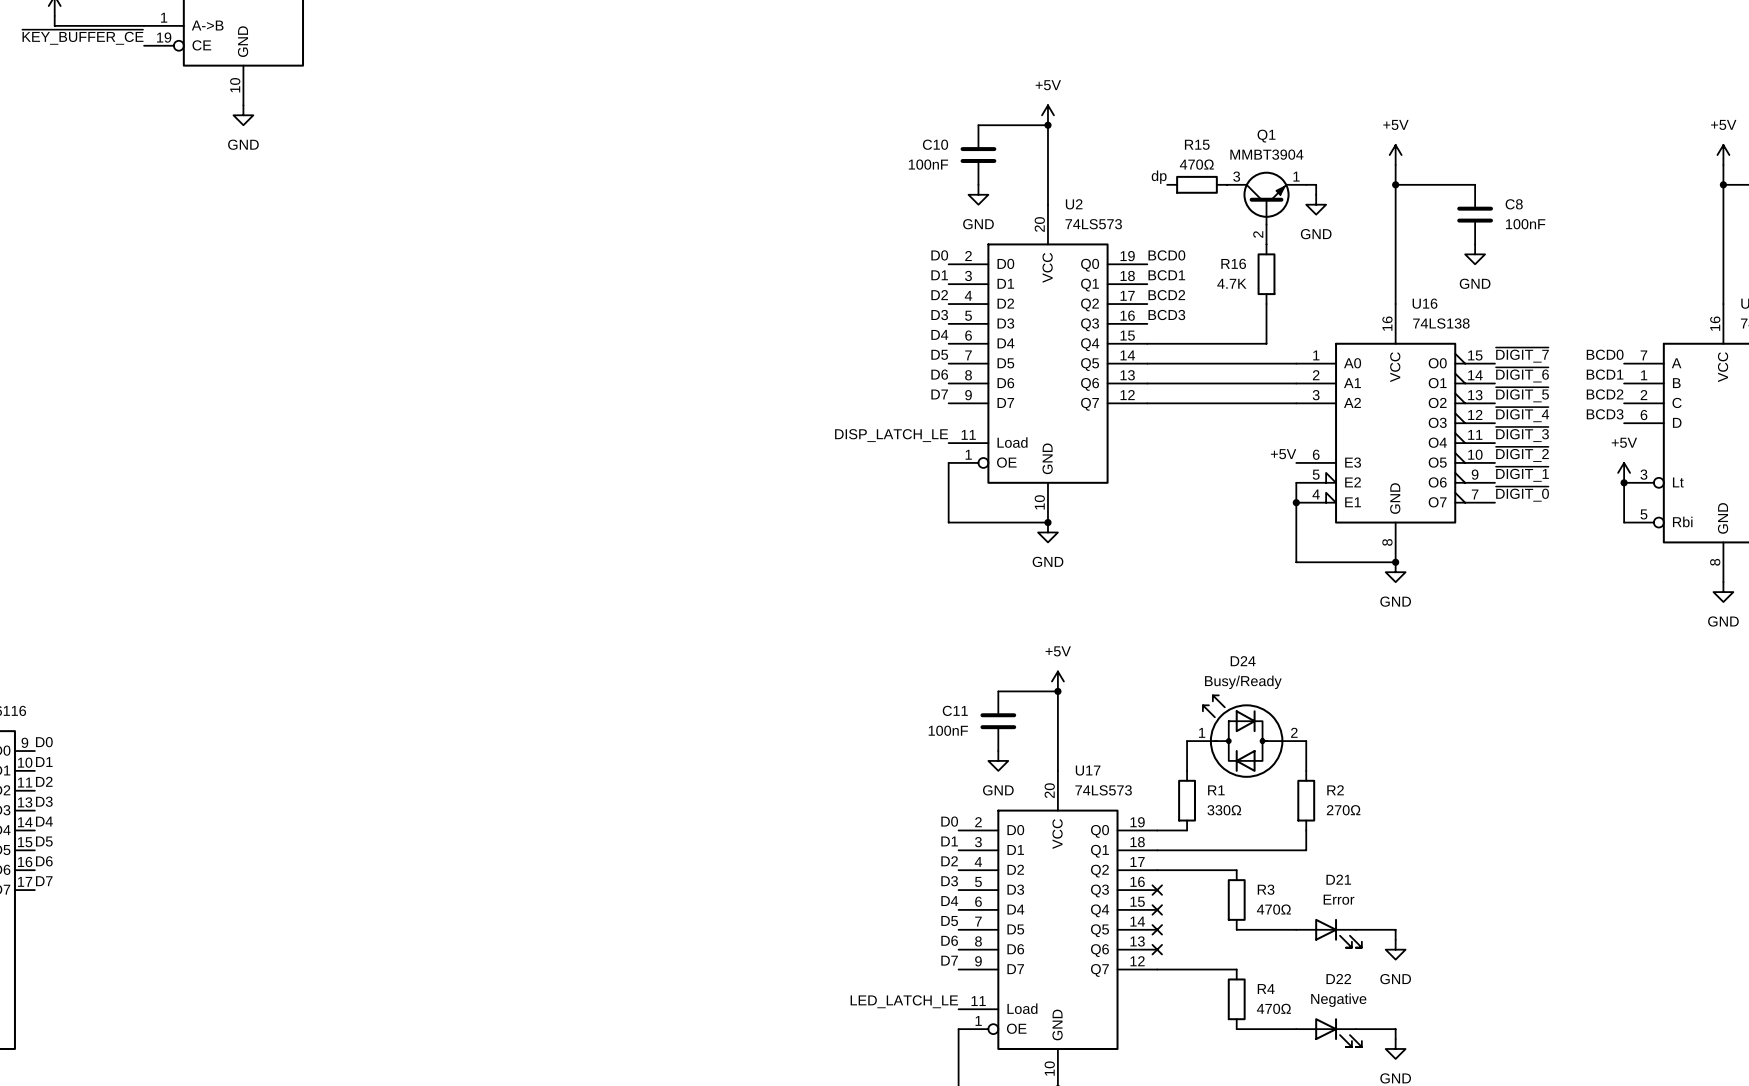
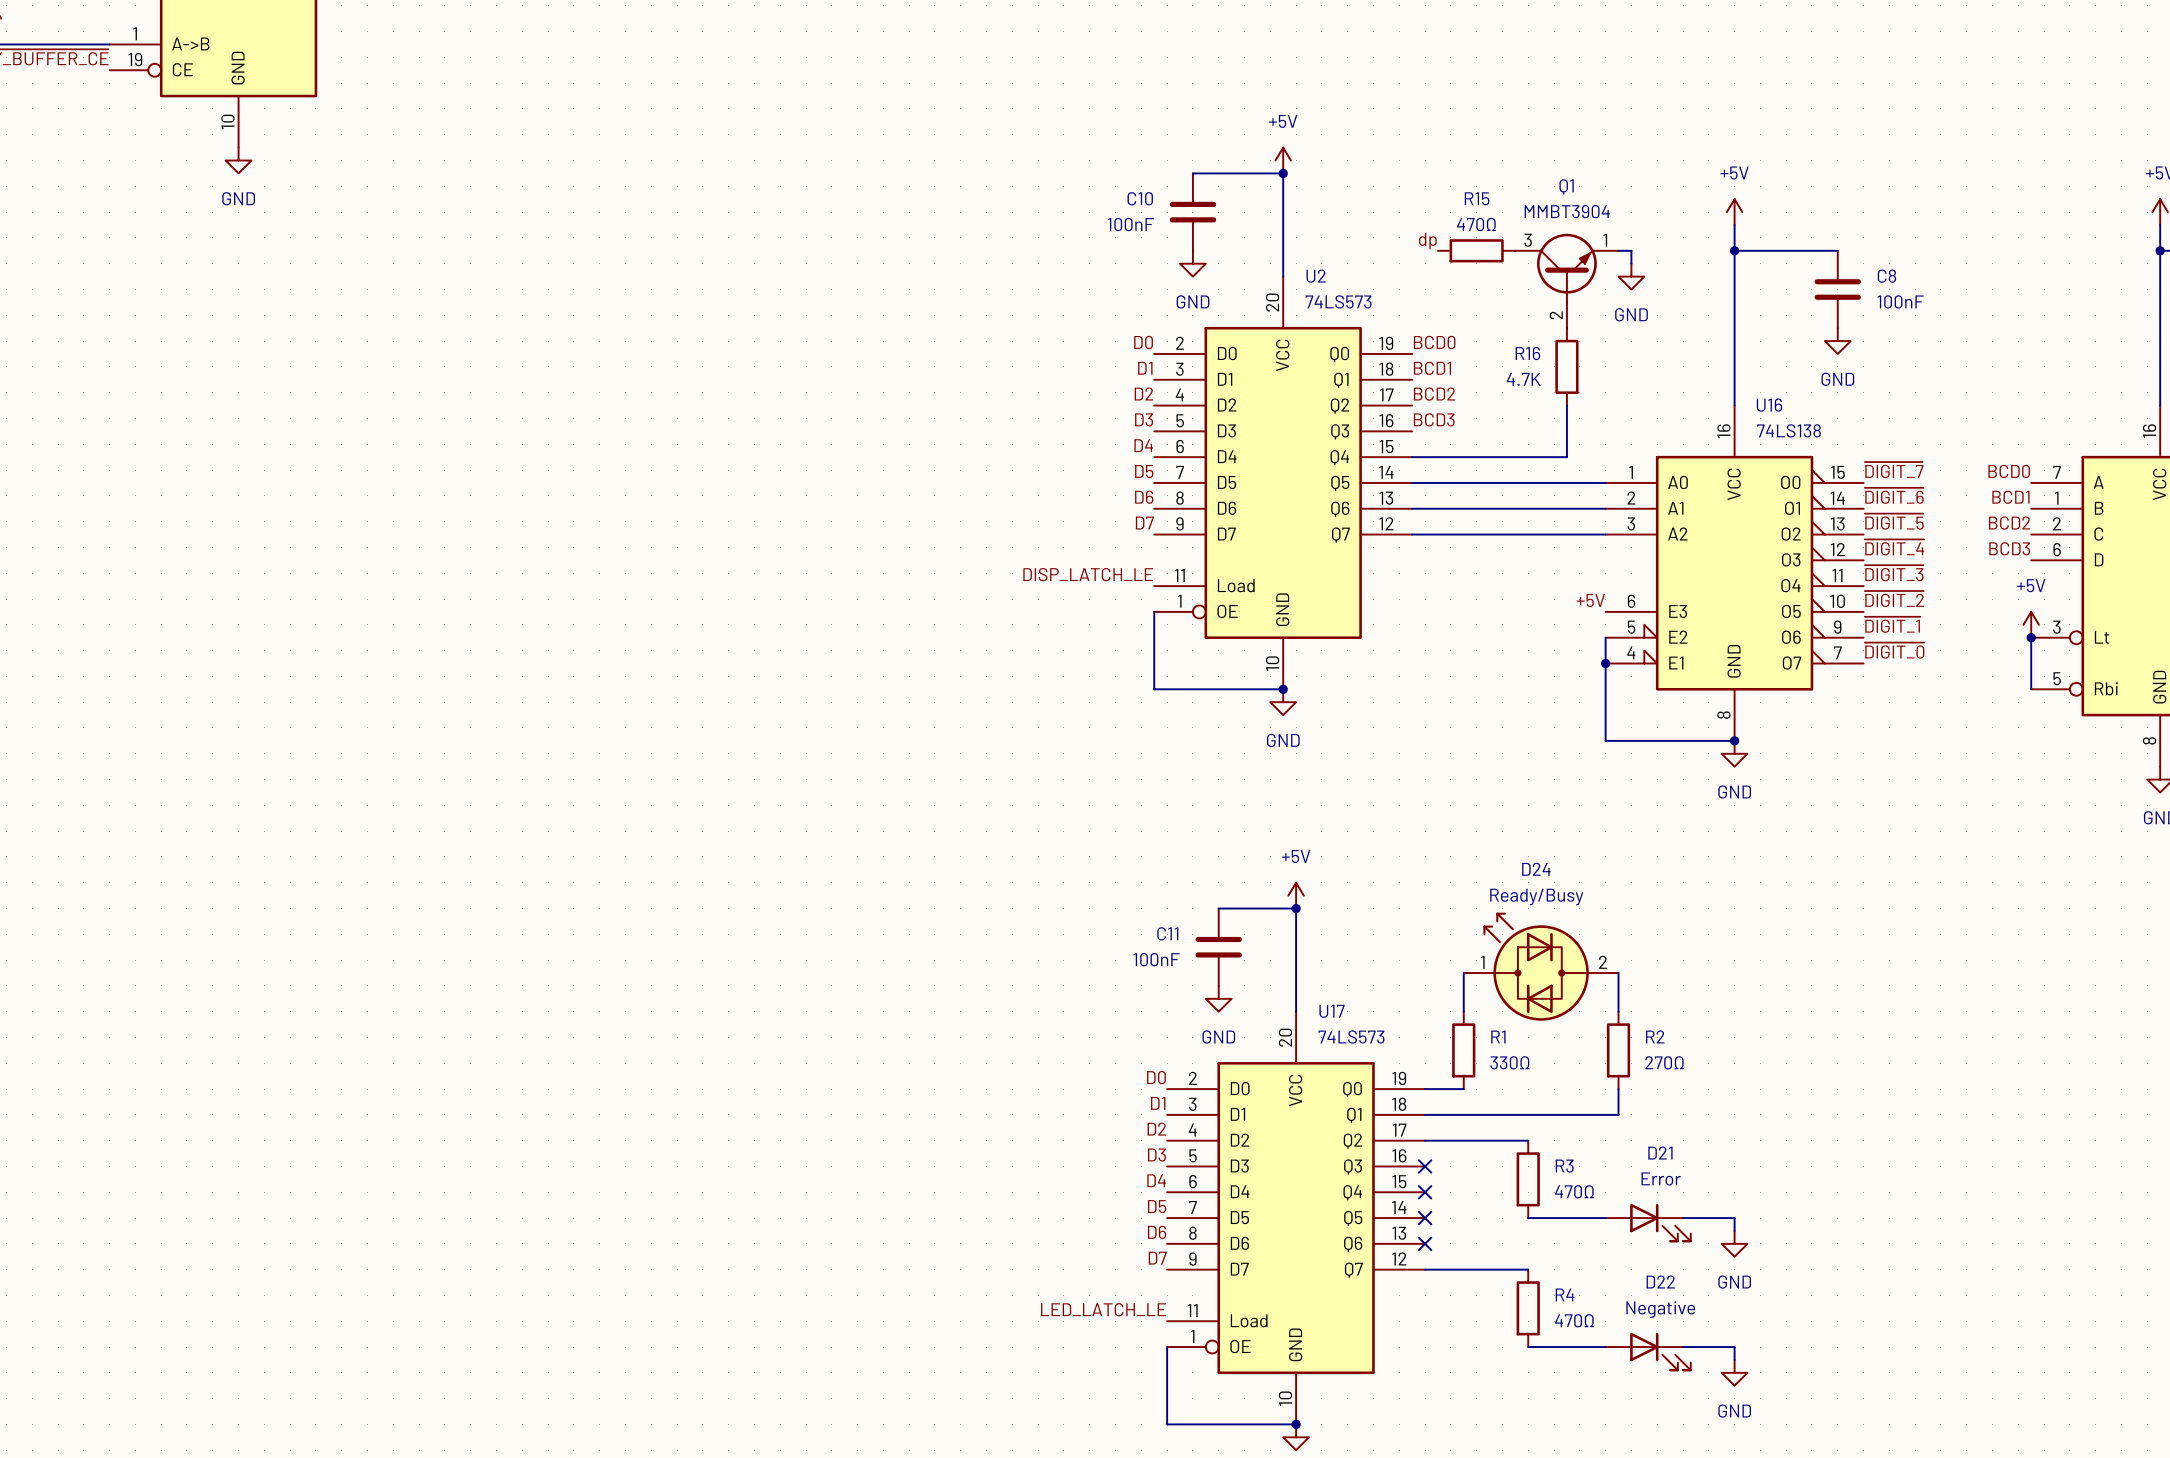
D24 value: Busy/Ready (1243, 682) -> Ready/Busy (1536, 897)

